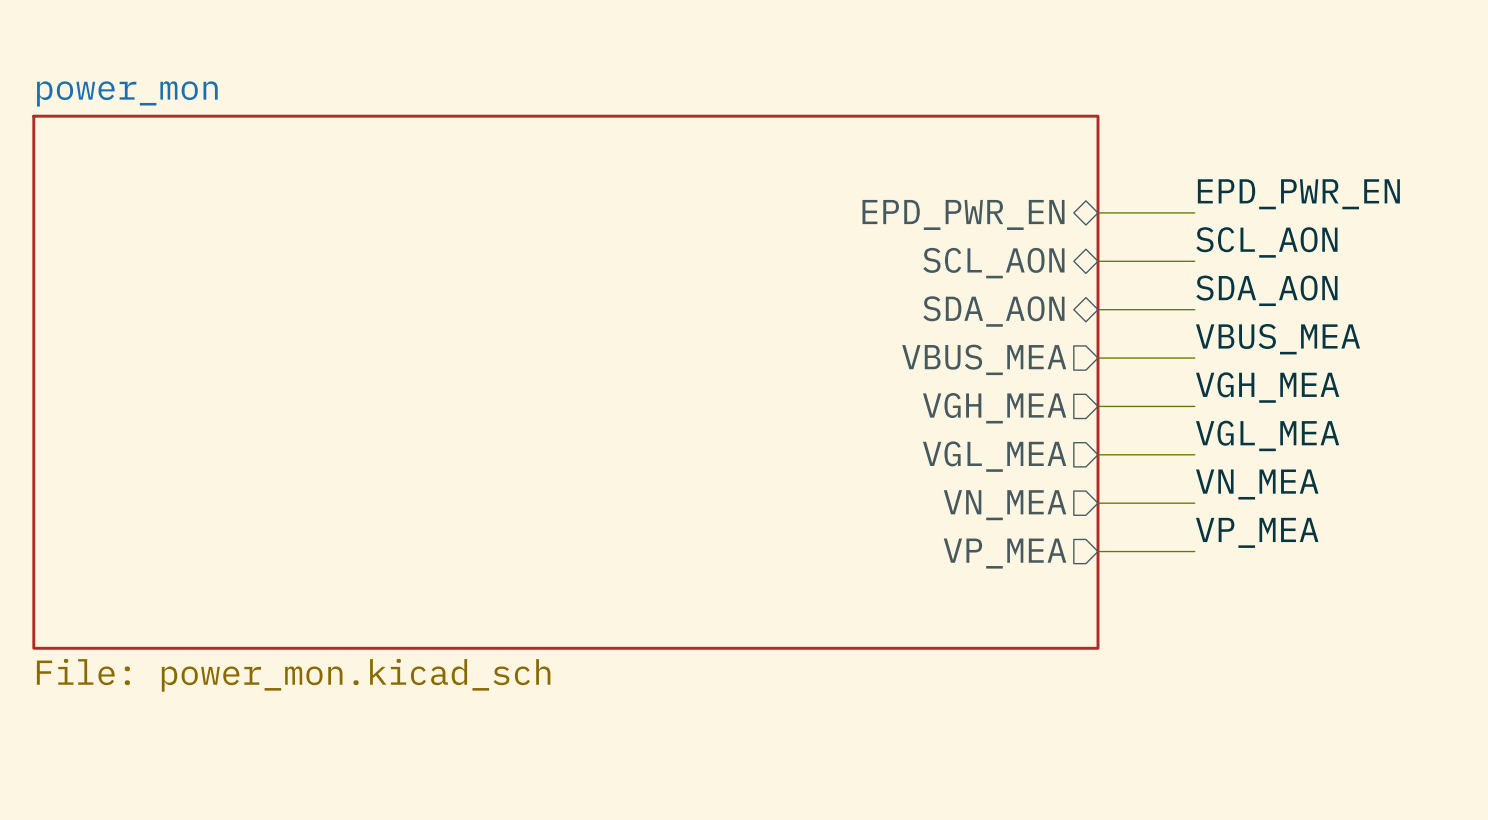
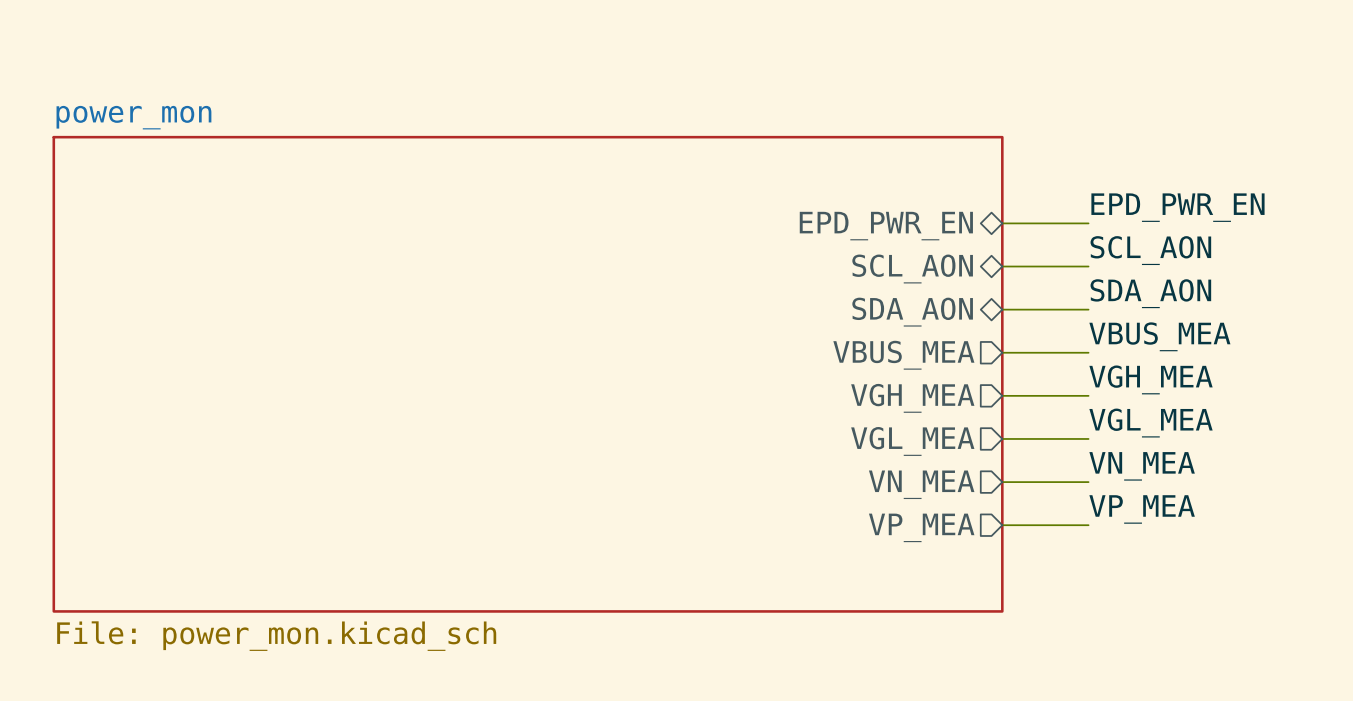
label: EPD_PWR_EN (1298, 194) -> none
wire: (1098, 212) (1194, 212) -> (1002, 525) (1088, 525)
sheet pin: EPD_PWR_EN (963, 214) -> none
label: SCL_AON (1266, 242) -> EPD_PWR_EN (1177, 207)
sheet pin: SCL_AON (993, 263) -> EPD_PWR_EN (886, 226)
label: SDA_AON (1266, 290) -> SCL_AON (1150, 250)
sheet pin: SDA_AON (993, 311) -> SCL_AON (912, 269)
label: VBUS_MEA (1278, 339) -> SDA_AON (1150, 293)
sheet pin shape: output (984, 359) -> bidirectional (912, 312)
sheet pin: VBUS_MEA (984, 359) -> SDA_AON (912, 312)
sheet power_mon position: (565, 382) -> (528, 374)
label: VGH_MEA (1267, 387) -> VBUS_MEA (1159, 336)
sheet pin: VGH_MEA (994, 408) -> VBUS_MEA (903, 355)
label: VGL_MEA (1267, 435) -> VGH_MEA (1151, 379)
sheet pin: VGL_MEA (994, 456) -> VGH_MEA (912, 398)
label: VN_MEA (1257, 484) -> VGL_MEA (1151, 423)
sheet pin: VN_MEA (1005, 505) -> VGL_MEA (912, 441)
label: VP_MEA (1257, 532) -> VN_MEA (1142, 466)
sheet pin: VP_MEA (1005, 553) -> VN_MEA (921, 484)
label: none -> VP_MEA (1142, 509)
sheet pin: none -> VP_MEA (921, 527)

